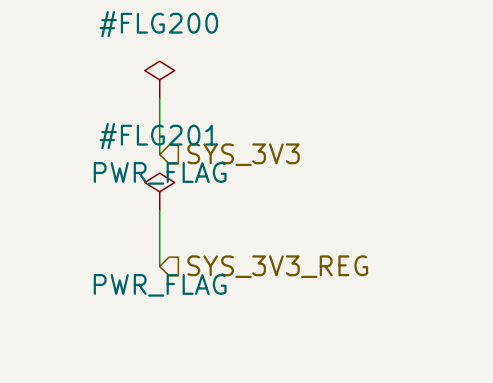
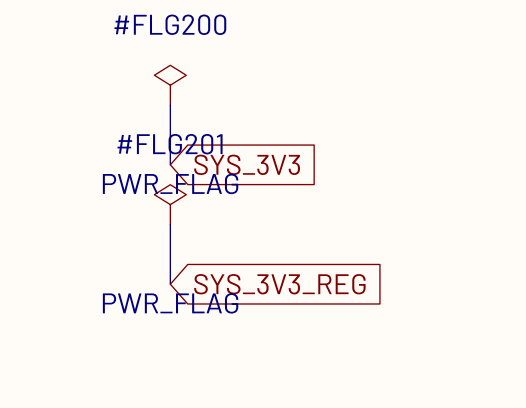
hierarchical label: SYS_3V3 (243, 154) -> none
global label: none -> SYS_3V3 (247, 164)
hierarchical label: SYS_3V3_REG (277, 266) -> none
global label: none -> SYS_3V3_REG (279, 284)

